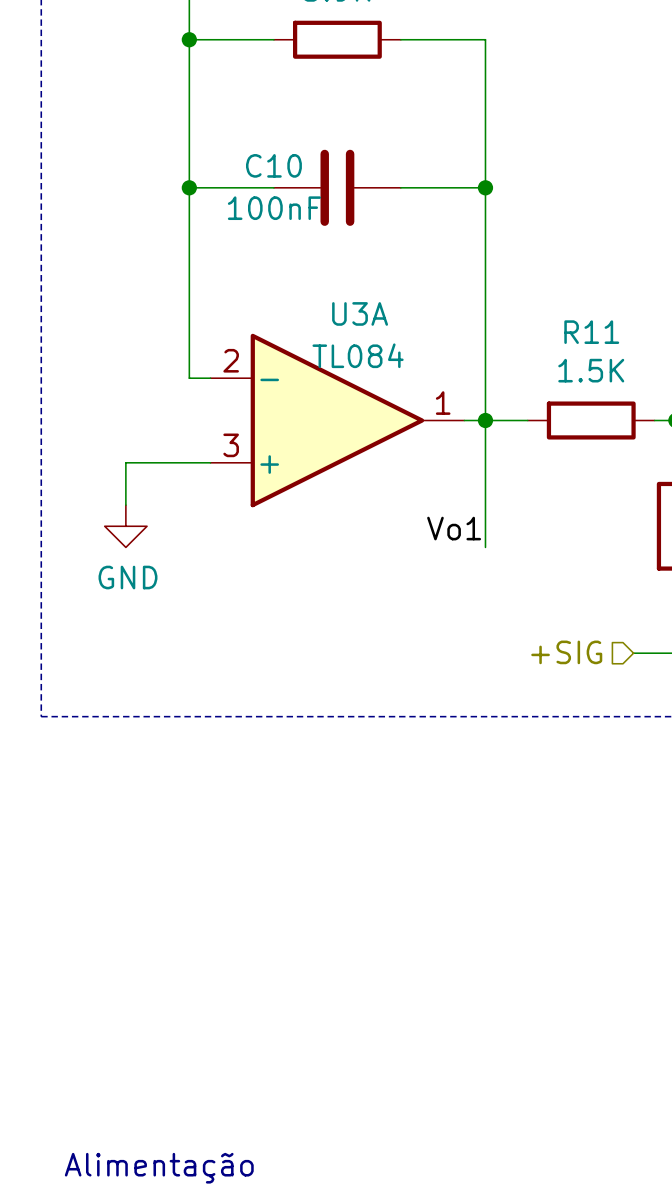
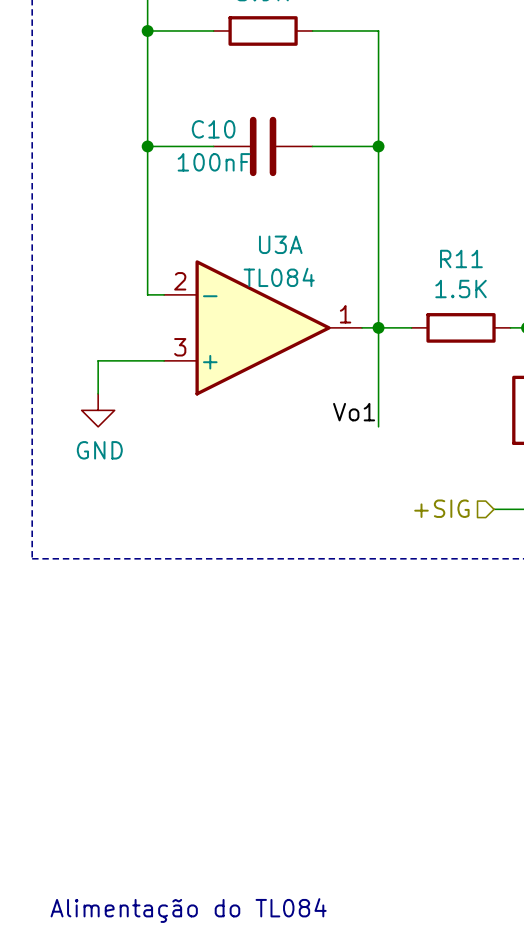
text: Alimentação (159, 1168) -> Alimentação do TL084 (188, 910)

